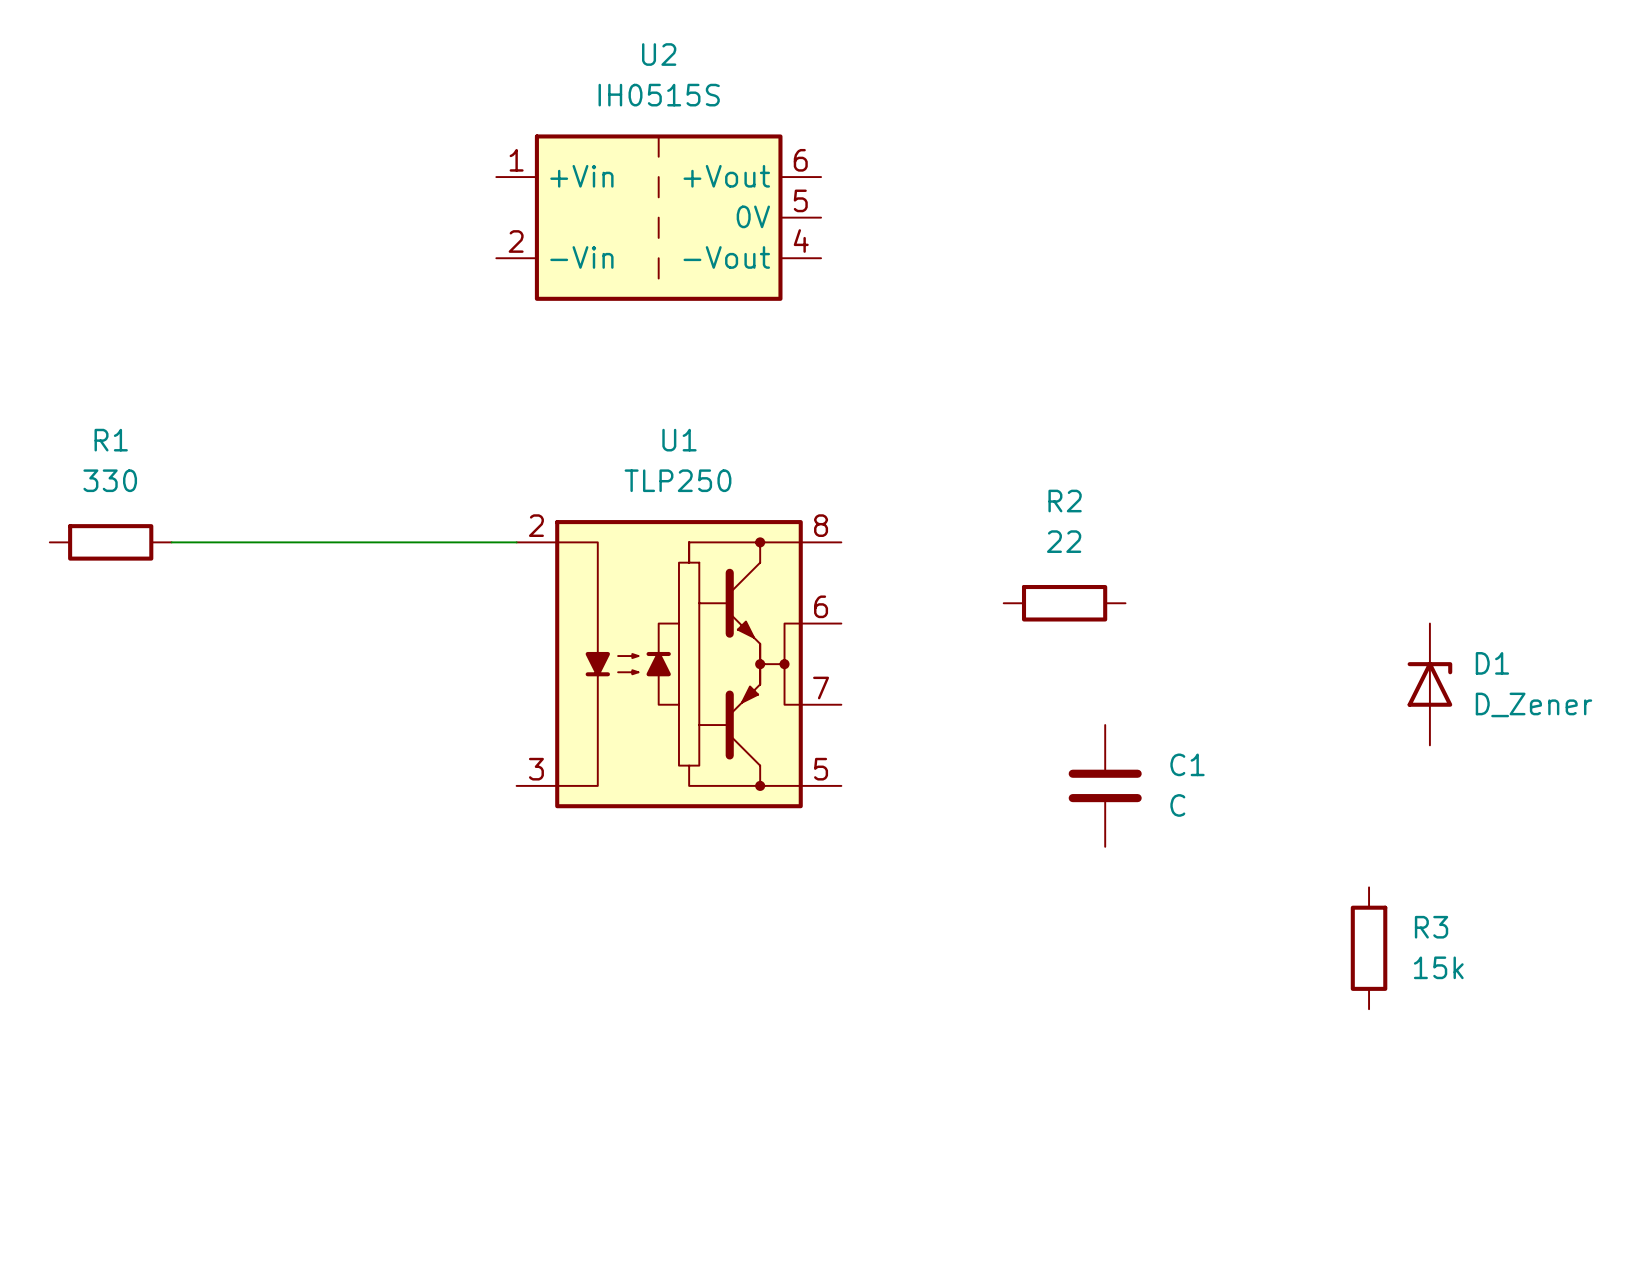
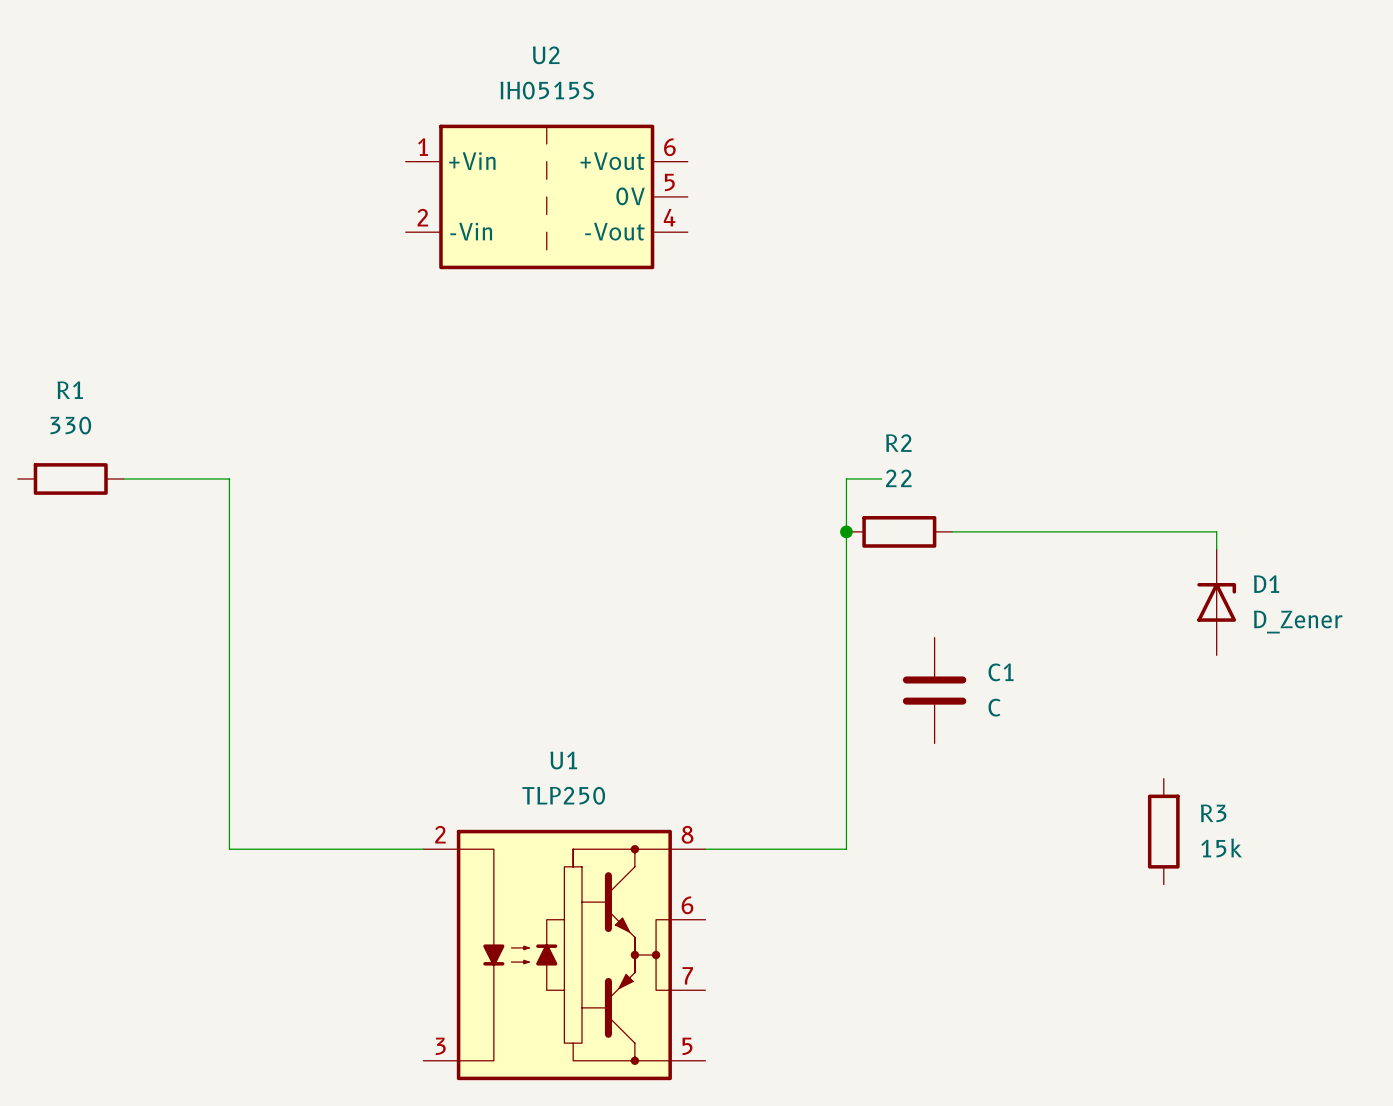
wire: (293, 542) (516, 542) -> (229, 479) (229, 849) (423, 849)
wire: none -> (881, 479) (846, 479) (846, 849) (705, 849)
junction: none -> (846, 531)
wire: none -> (952, 531) (1216, 531) (1216, 549)
U1 position: (678, 664) -> (564, 955)

